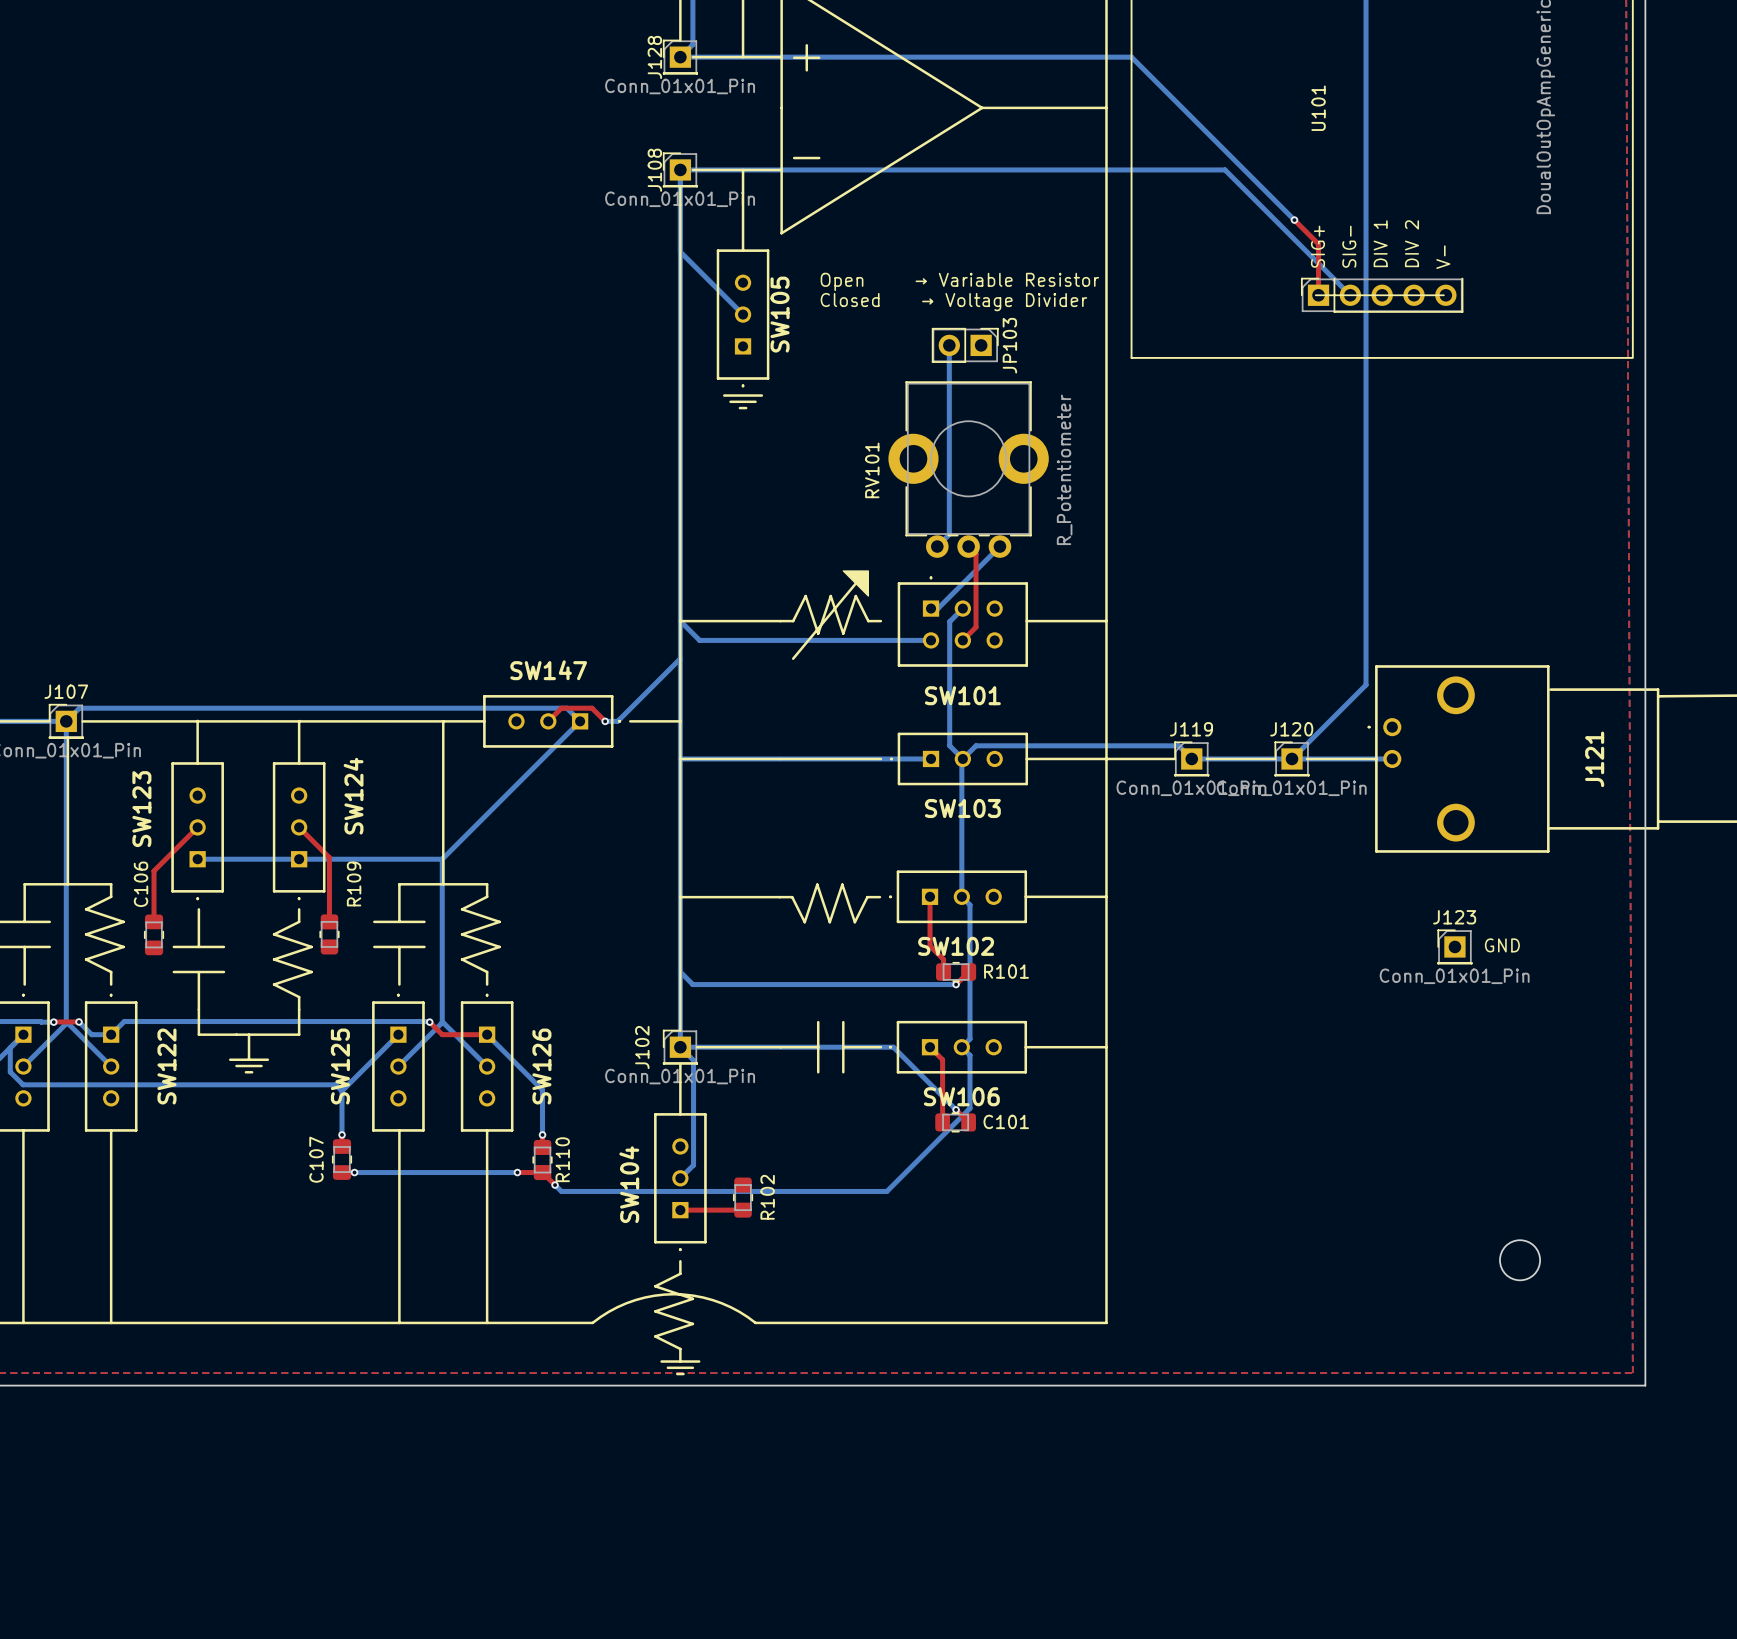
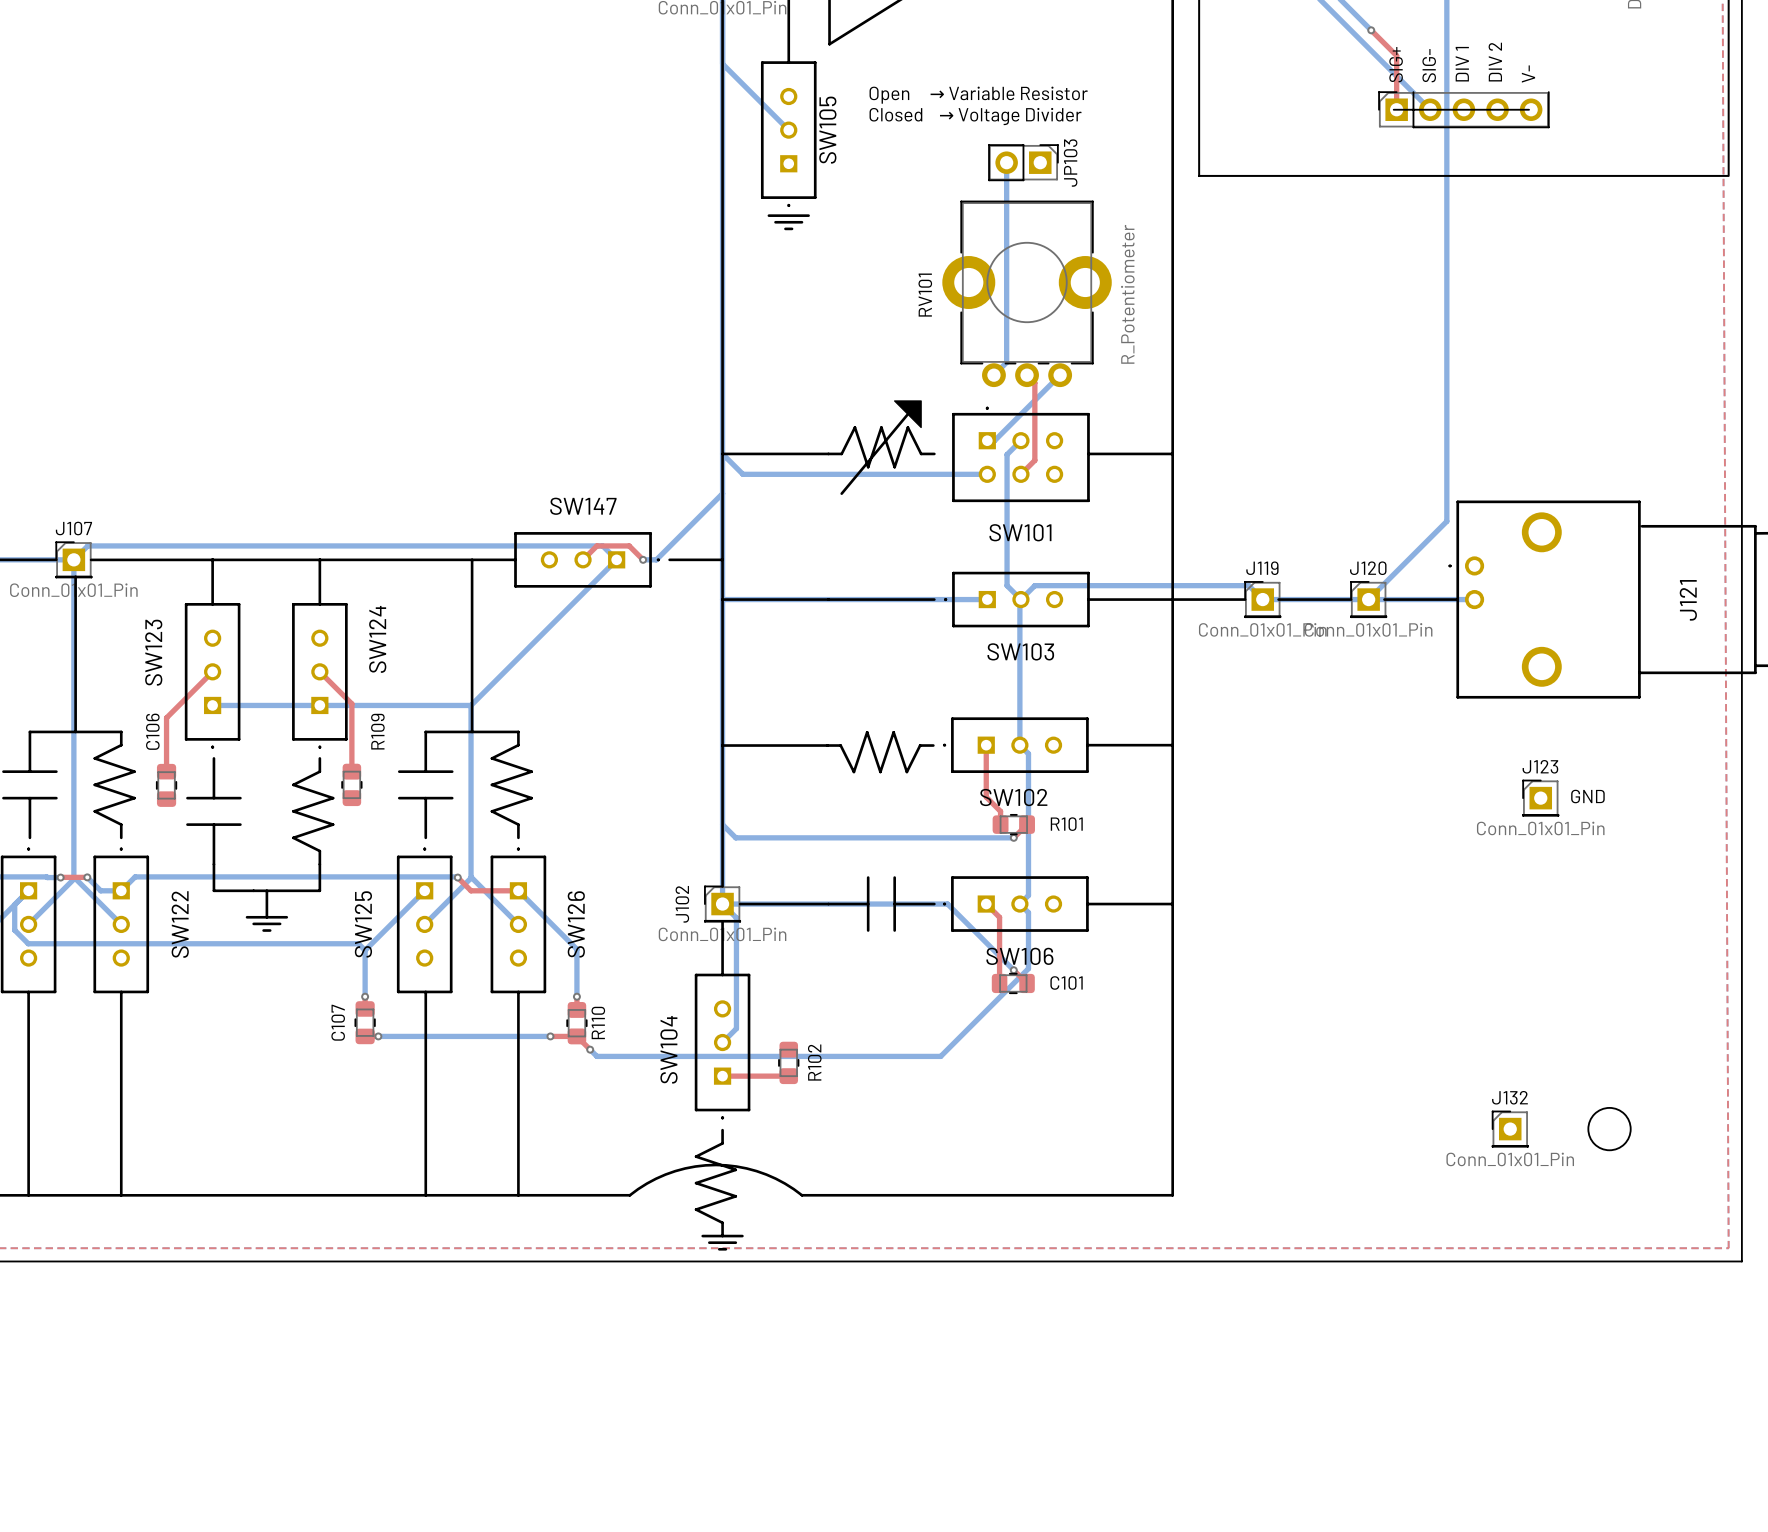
J132: none -> Conn_01x01_Pin (1510, 1129)

